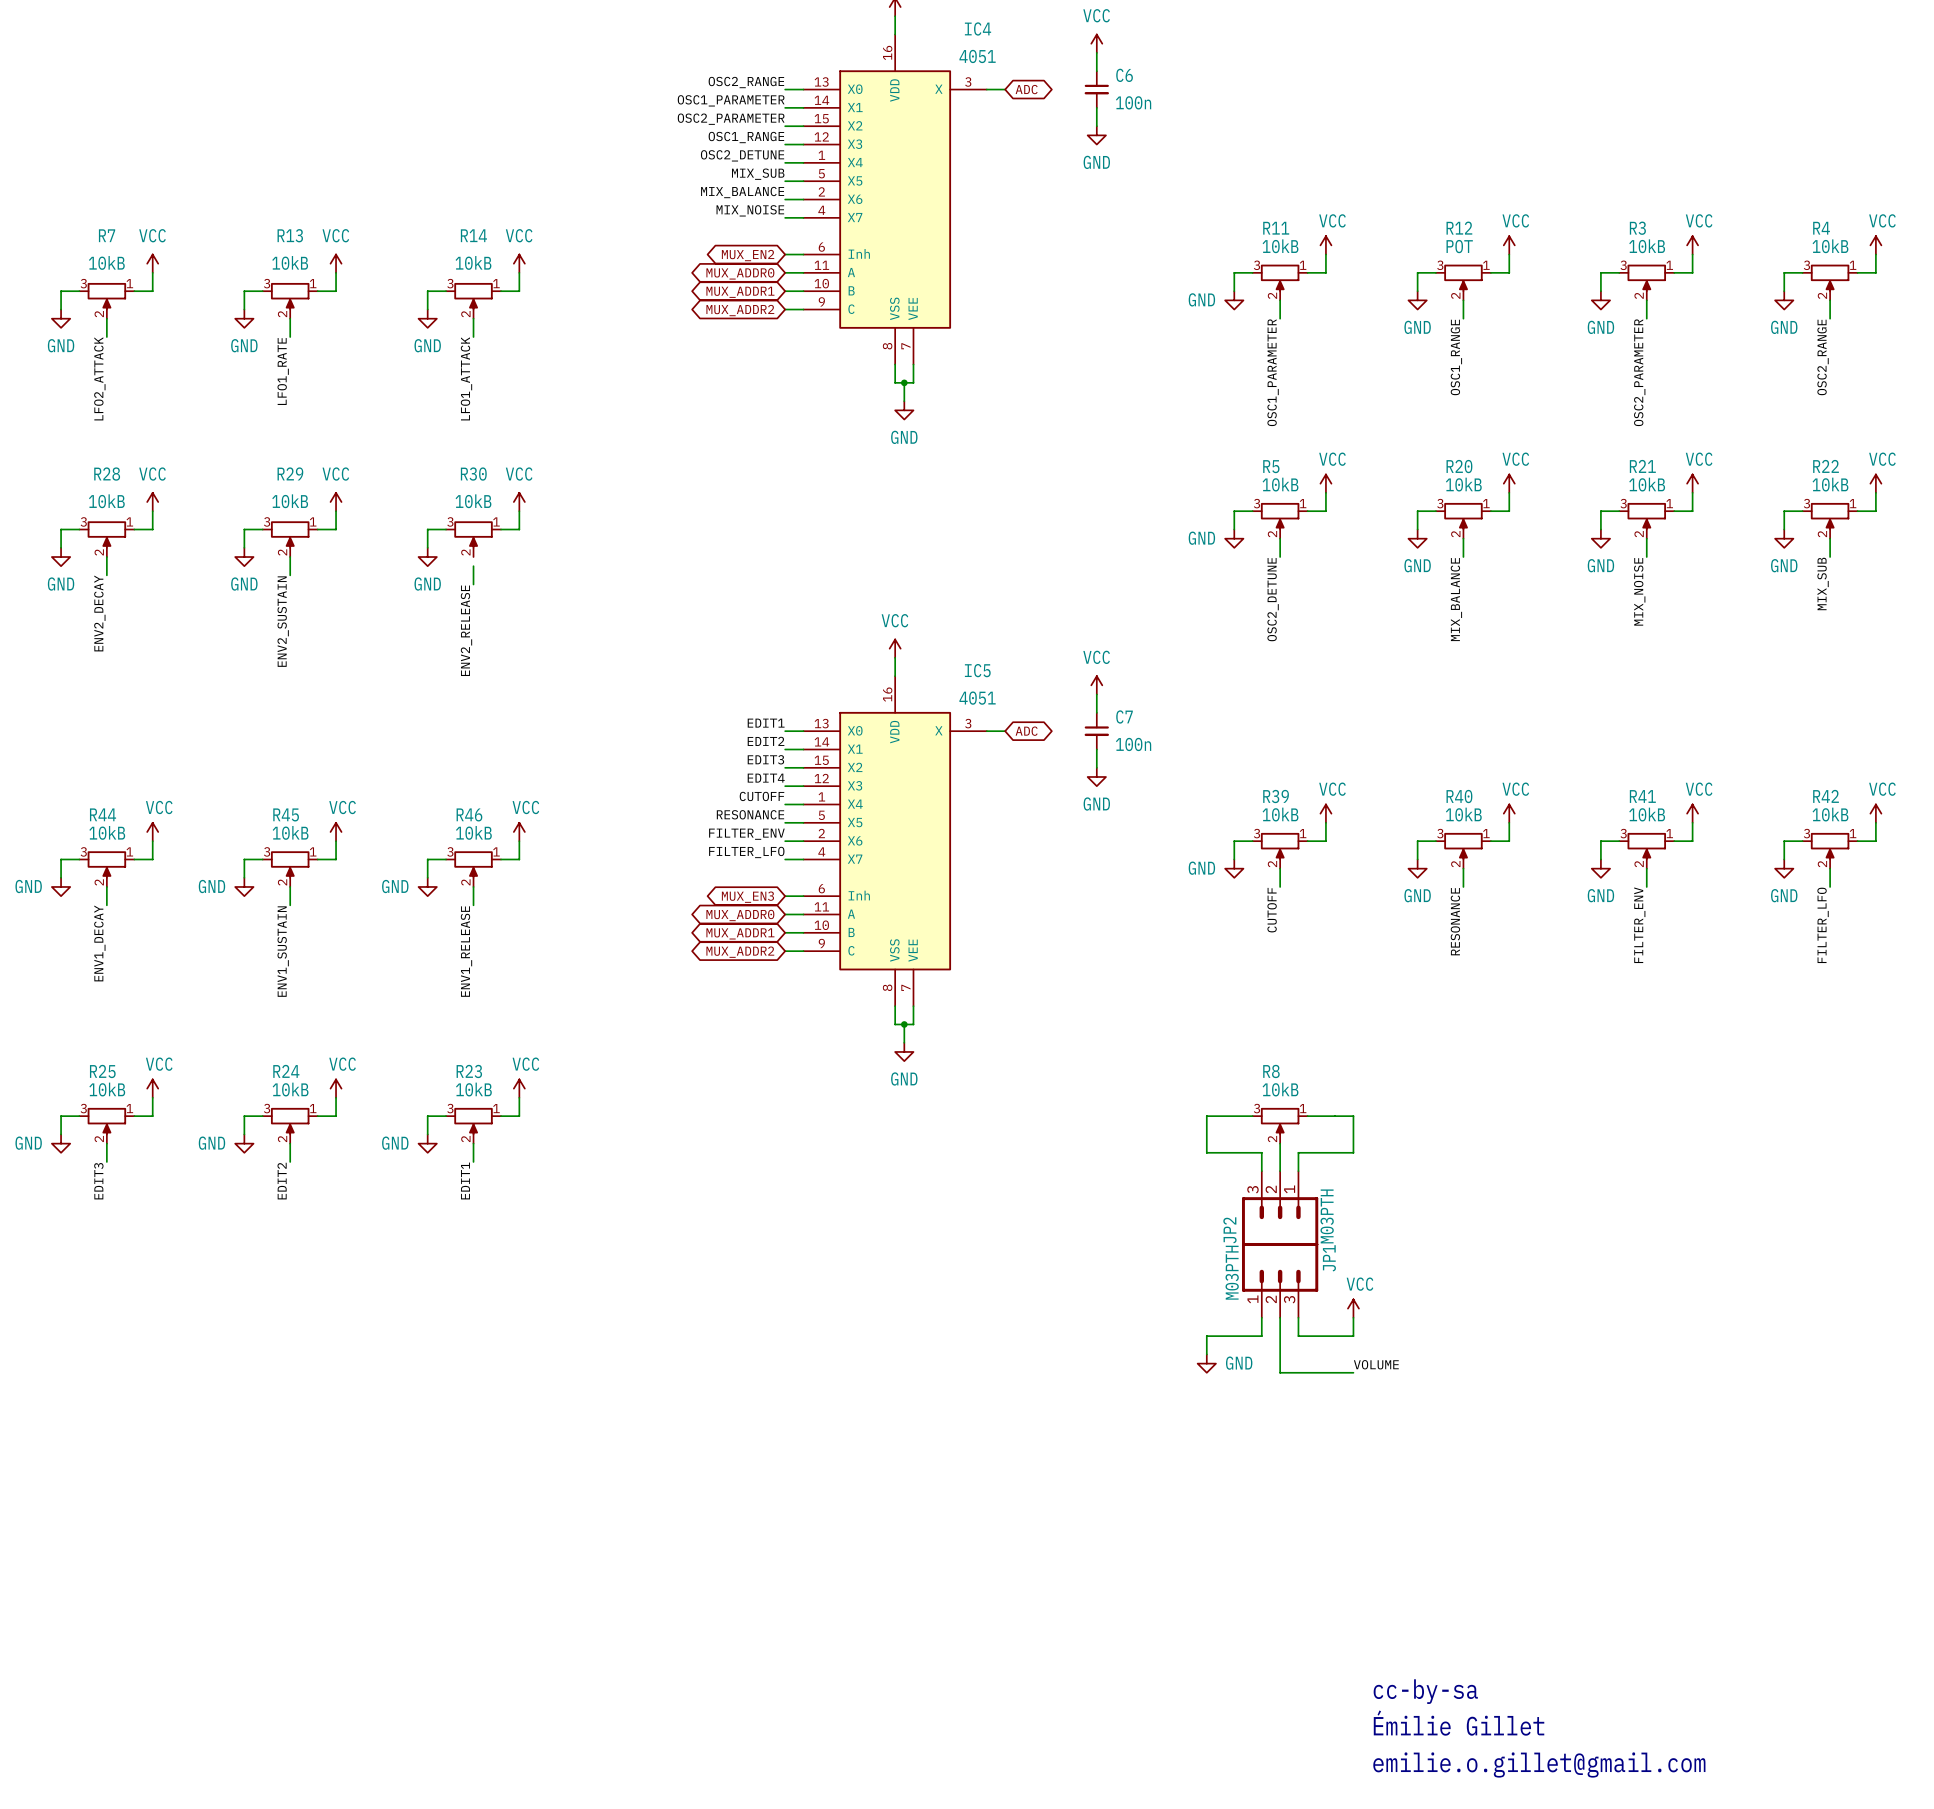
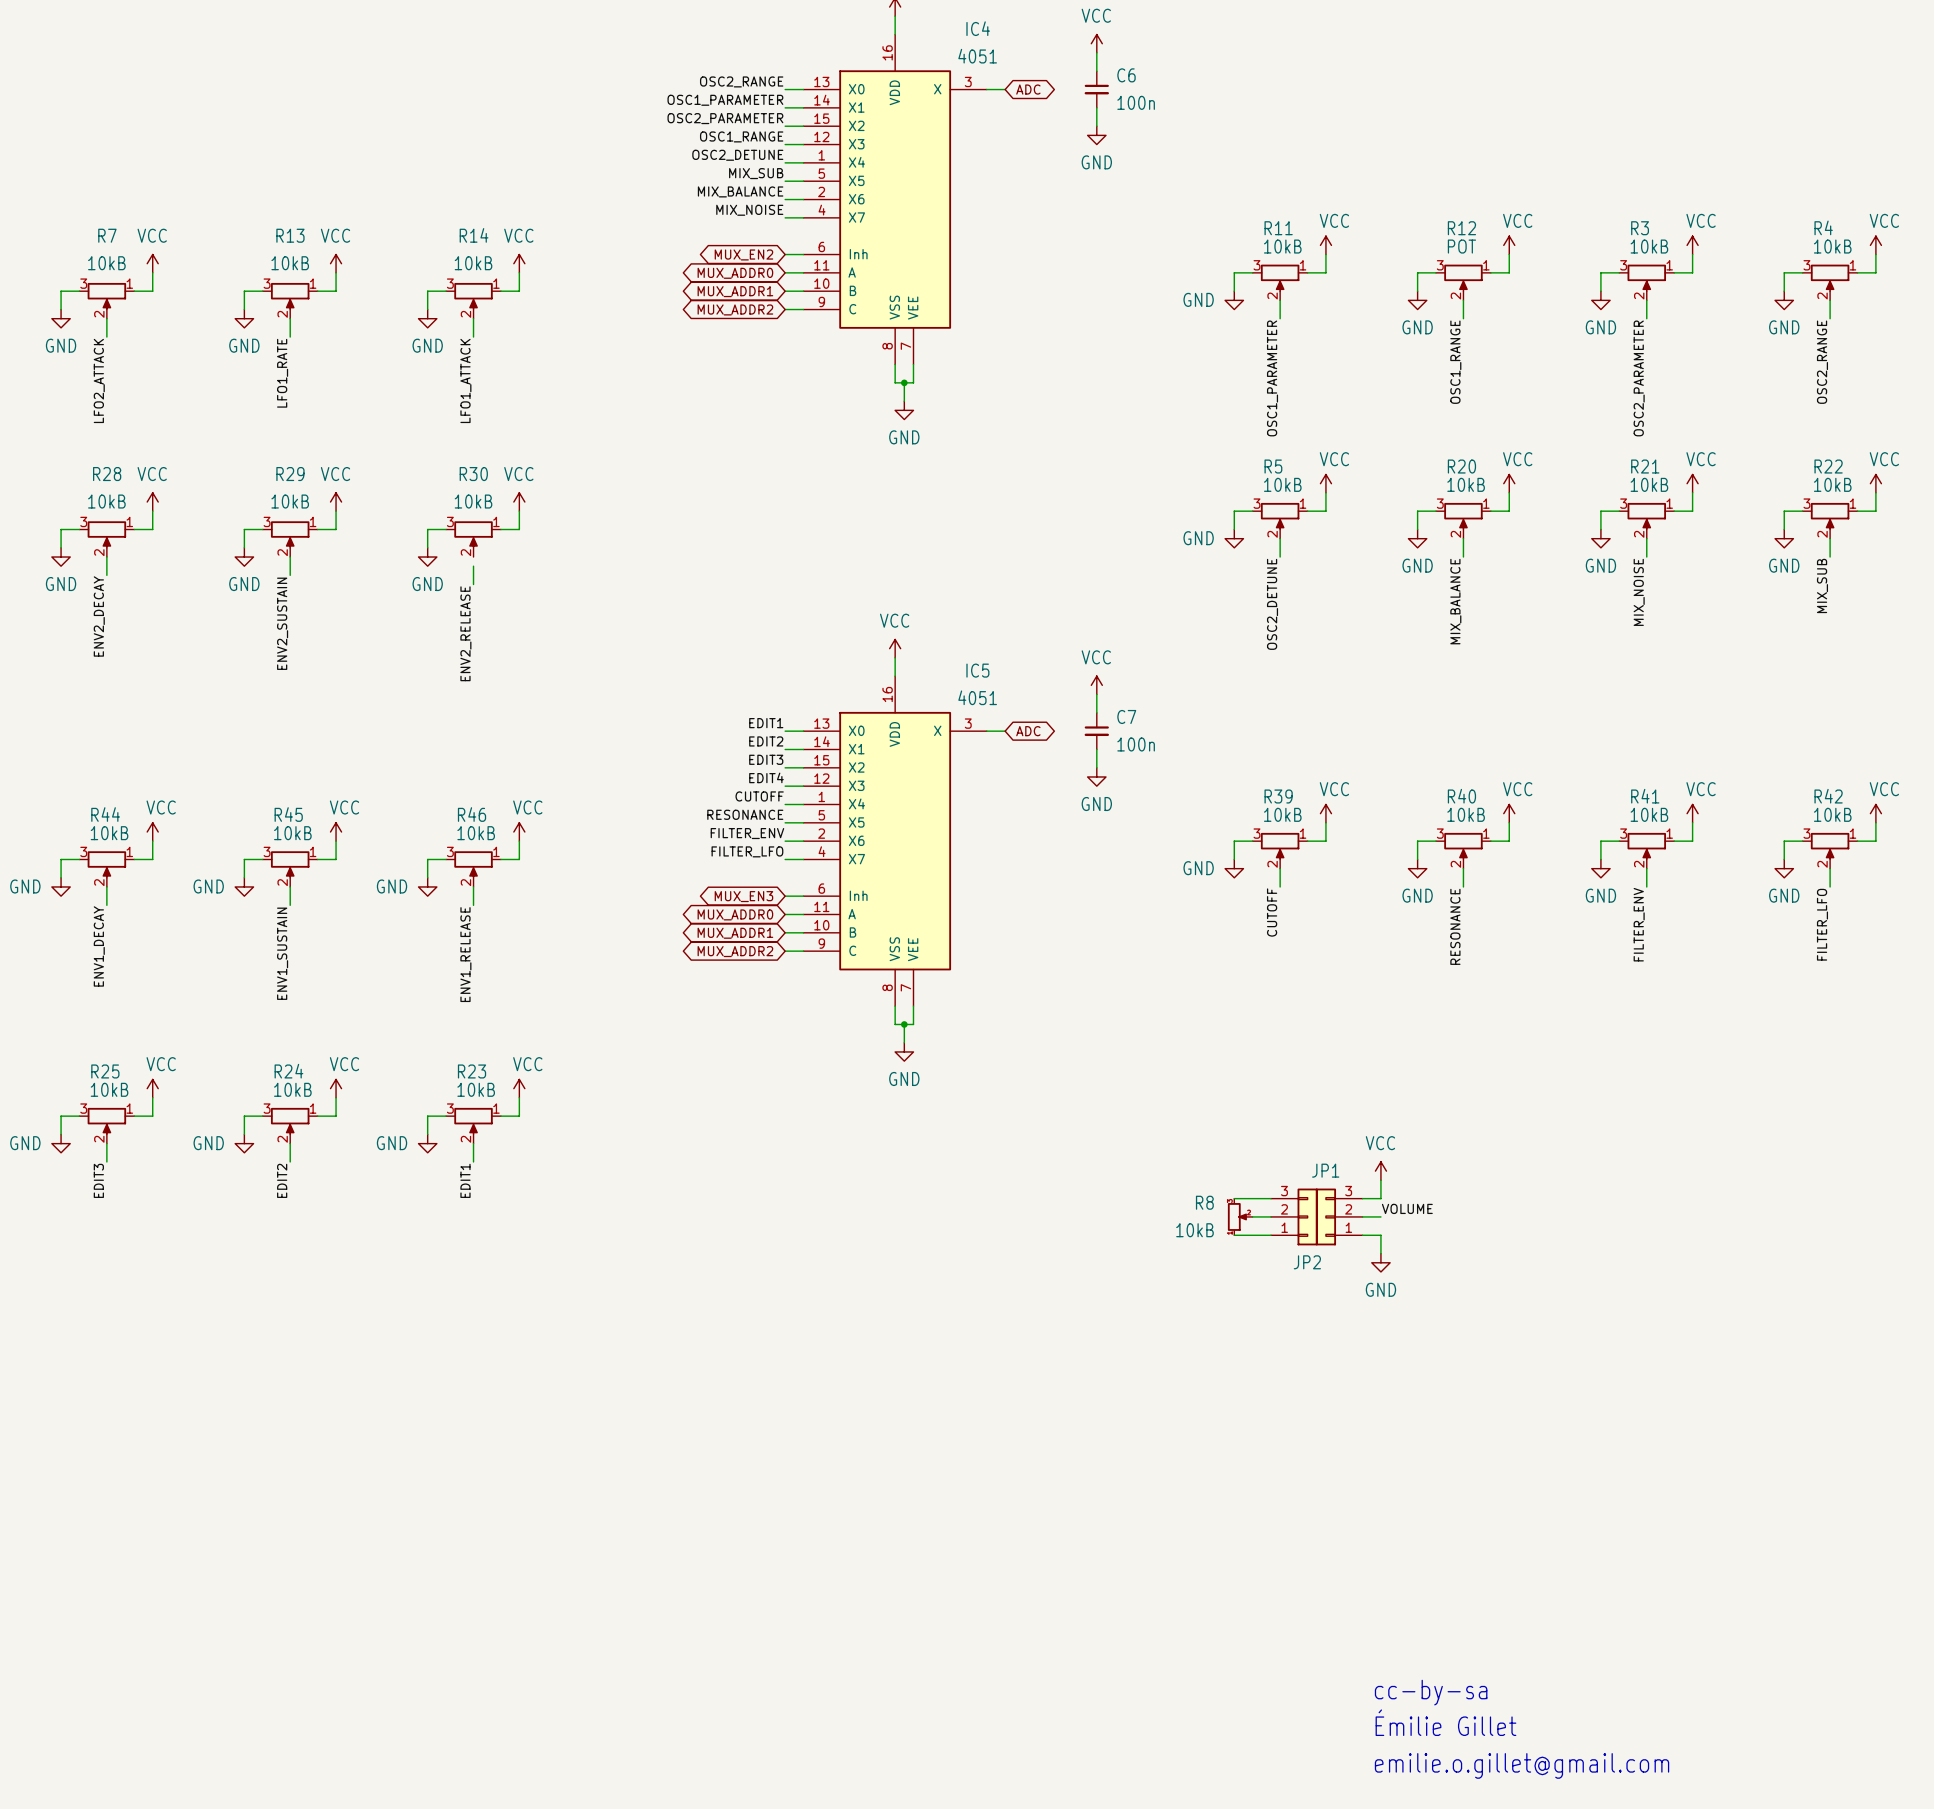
R8 name position: R8 (1271, 1071) -> R8 (1204, 1202)
R8 value position: 10kB (1280, 1089) -> 10kB (1194, 1230)
R8 symbol: [1252, 1107, 1308, 1144] -> [1227, 1198, 1253, 1236]
wire: (1252, 1116) (1206, 1116) (1206, 1152) (1261, 1152) (1261, 1171) -> none
wire: (1307, 1116) (1353, 1116) (1353, 1152) (1298, 1152) (1298, 1171) -> none
wire: (1280, 1143) (1280, 1171) -> none
JP2 symbol: [1241, 1171, 1319, 1246] -> [1270, 1188, 1318, 1246]
wire: none -> (1380, 1180) (1380, 1198) (1362, 1198)
wire: none -> (1252, 1216) (1270, 1216)
JP2 value: M03PTH (1327, 1216) -> none
wire: none -> (1362, 1216) (1380, 1216)
JP2 name position: JP2 (1229, 1230) -> JP2 (1307, 1262)
wire: none -> (1234, 1235) (1270, 1235)
wire: none -> (1362, 1235) (1380, 1235) (1380, 1253)
JP1 symbol: [1241, 1242, 1319, 1318] -> [1315, 1188, 1363, 1246]
JP1 name position: JP1 (1329, 1258) -> JP1 (1325, 1170)
power symbol: none -> GND (1380, 1262)
JP1 value: M03PTH (1232, 1272) -> none
power symbol text position: VCC (1359, 1284) -> VCC (1380, 1143)
power symbol position: VCC (1353, 1308) -> VCC (1380, 1171)
wire: (1261, 1317) (1261, 1336) (1206, 1336) (1206, 1354) -> none
wire: (1280, 1317) (1280, 1372) (1353, 1372) -> none
wire: (1298, 1317) (1298, 1336) (1353, 1336) (1353, 1317) -> none
power symbol: GND (1206, 1363) -> none
label position: VOLUME (1376, 1364) -> VOLUME (1407, 1208)

